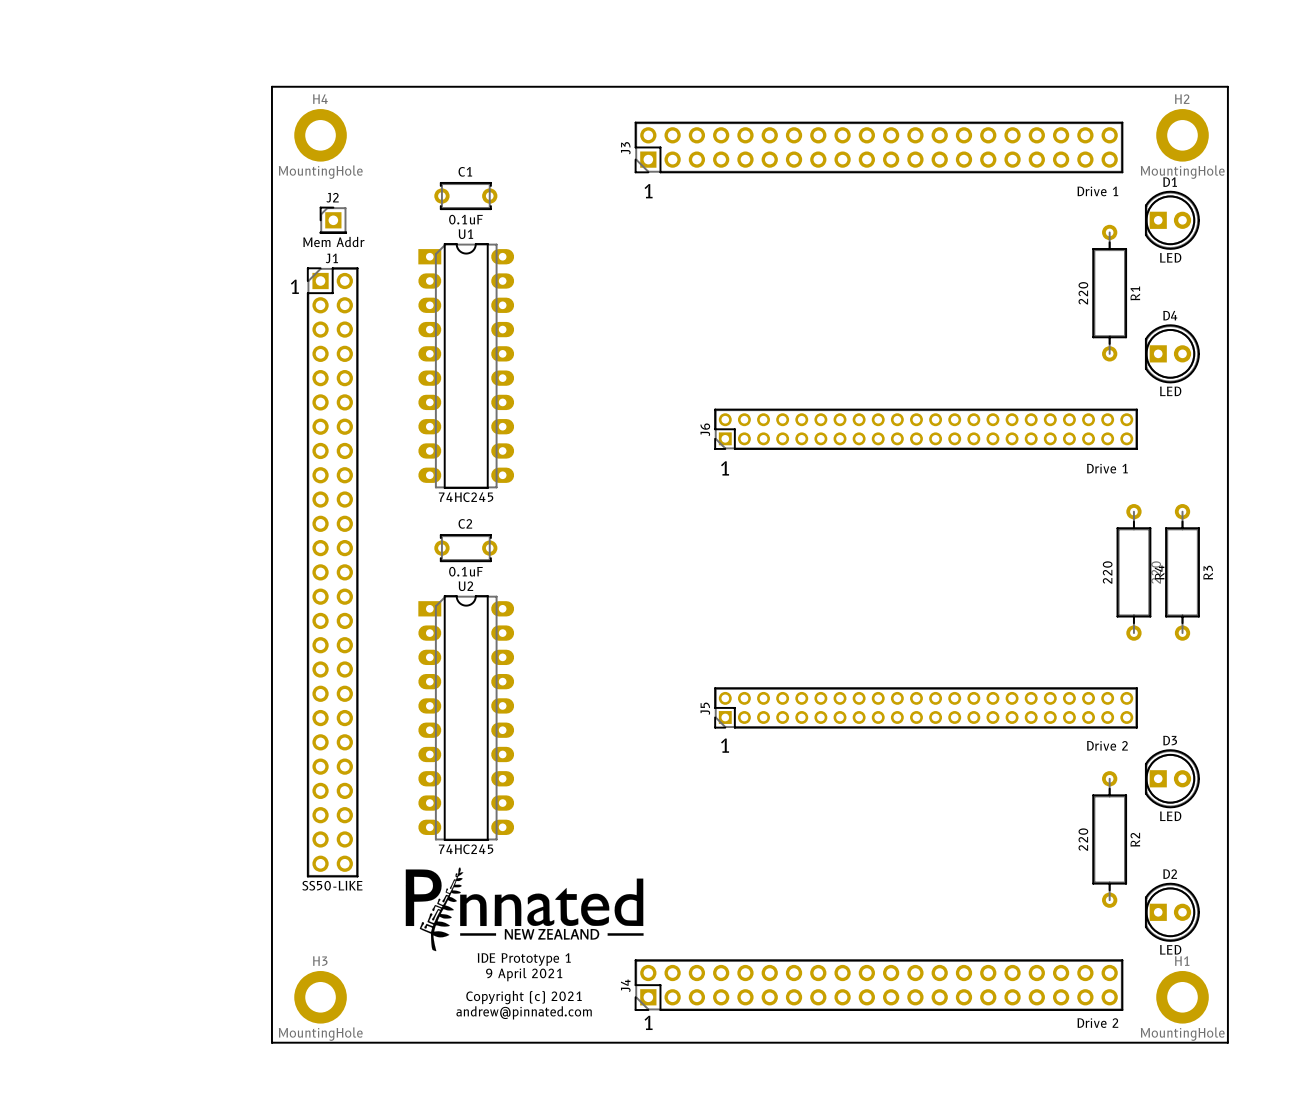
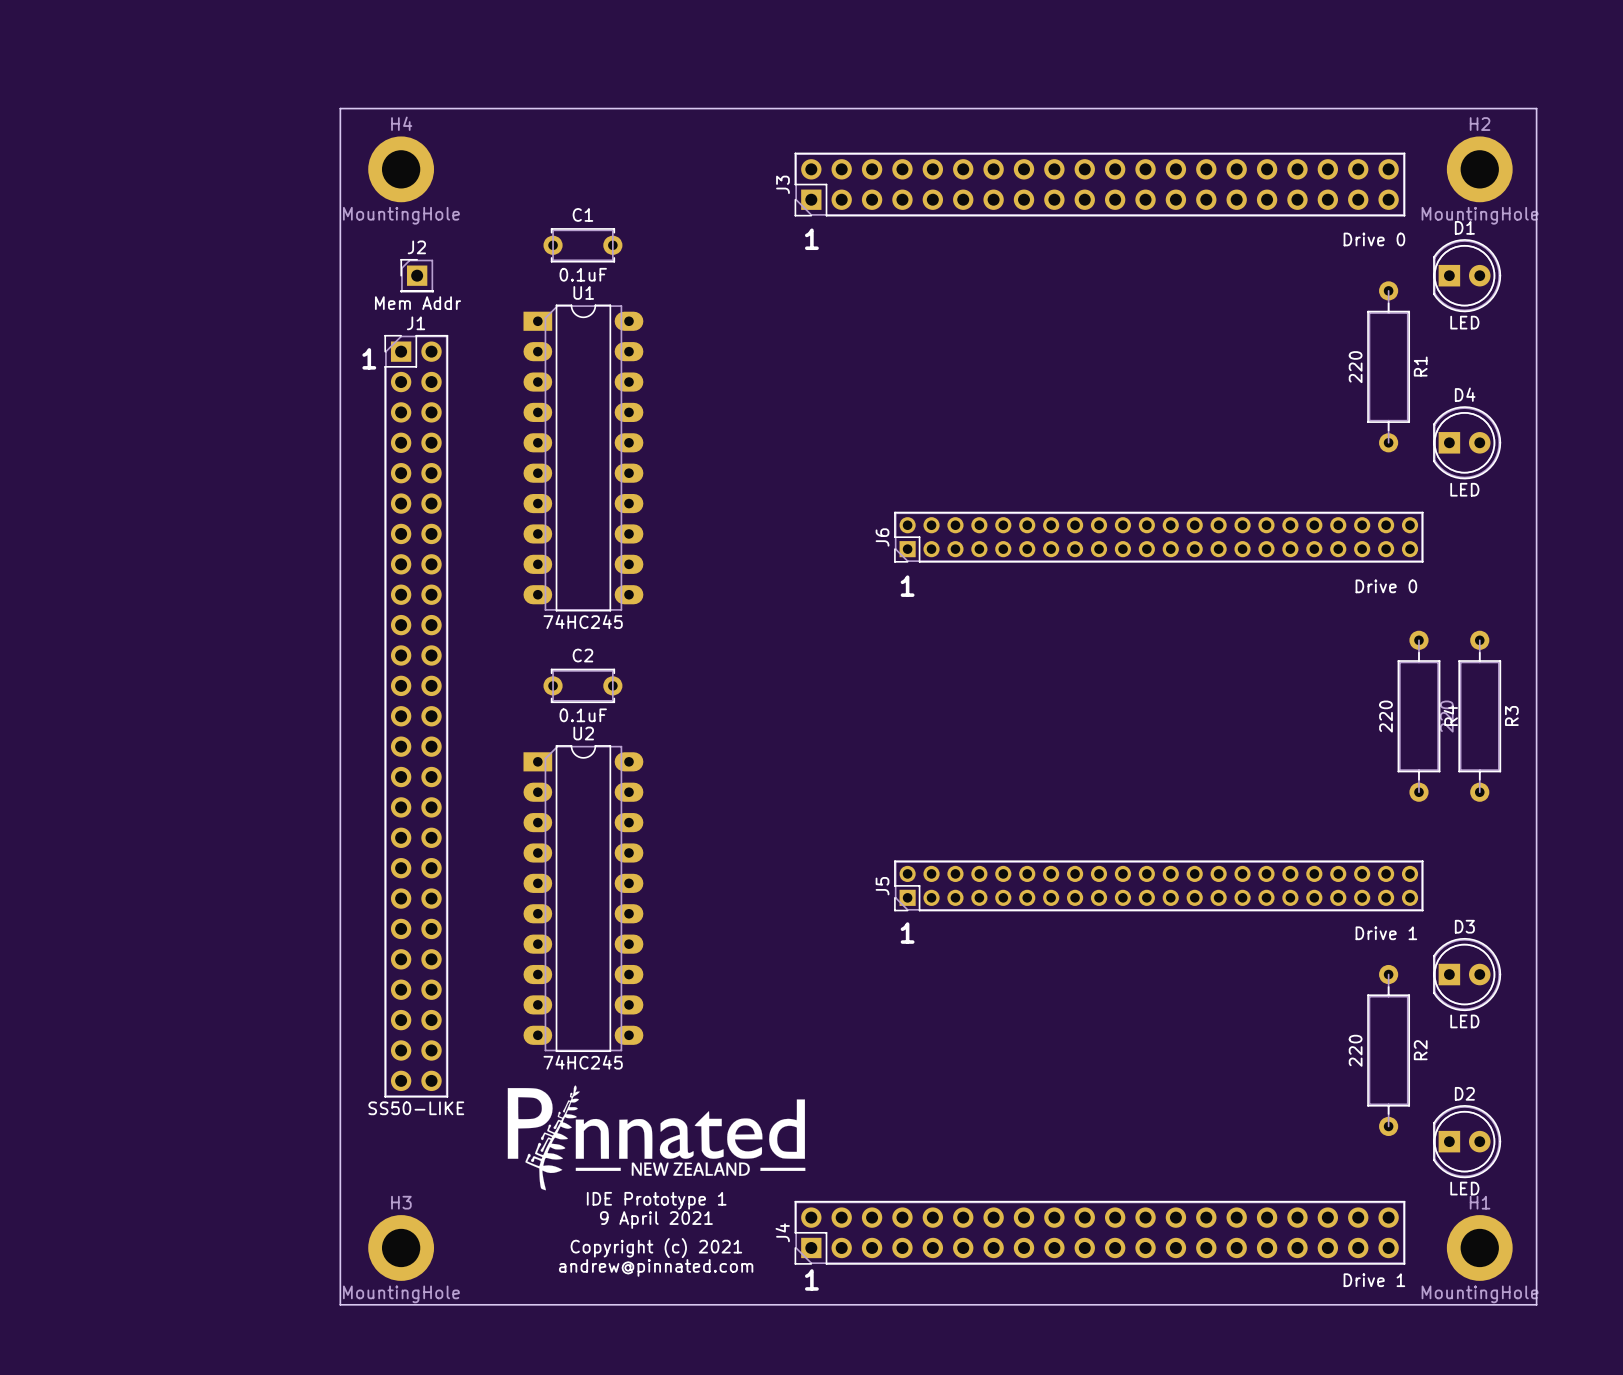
J3 value: Drive 1 (1097, 191) -> Drive 0 (1374, 239)
J6 value: Drive 1 (1107, 468) -> Drive 0 (1386, 586)
J5 value: Drive 2 (1107, 745) -> Drive 1 (1386, 933)
J4 value: Drive 2 (1097, 1023) -> Drive 1 (1374, 1280)

